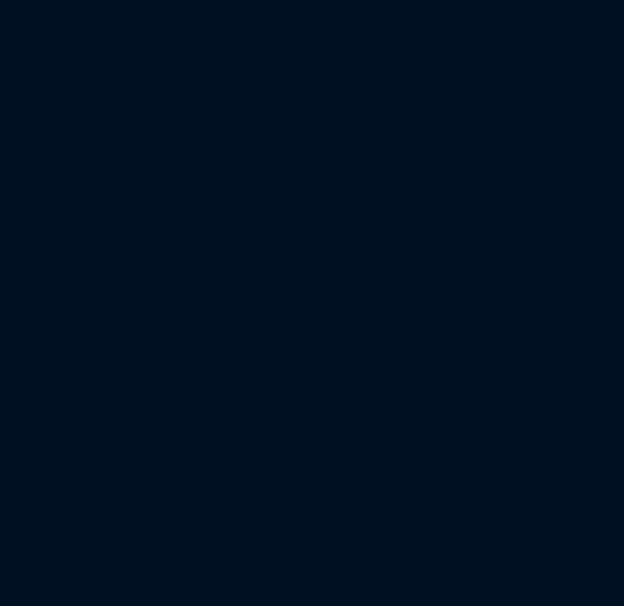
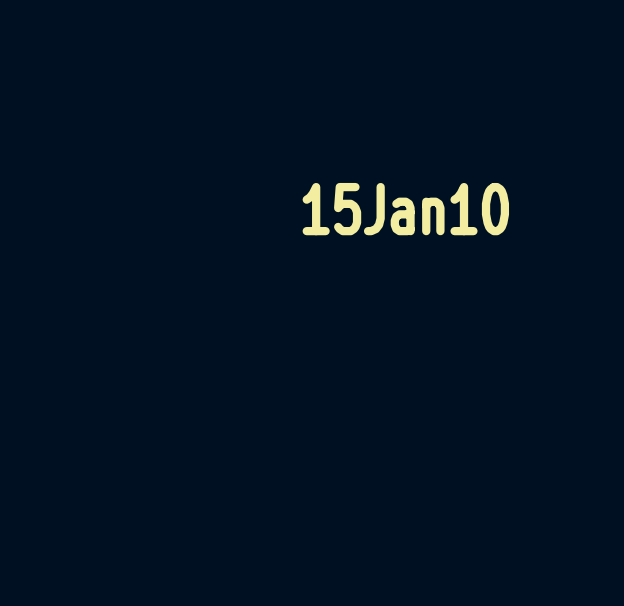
text: none -> 15Jan10 (405, 209)

